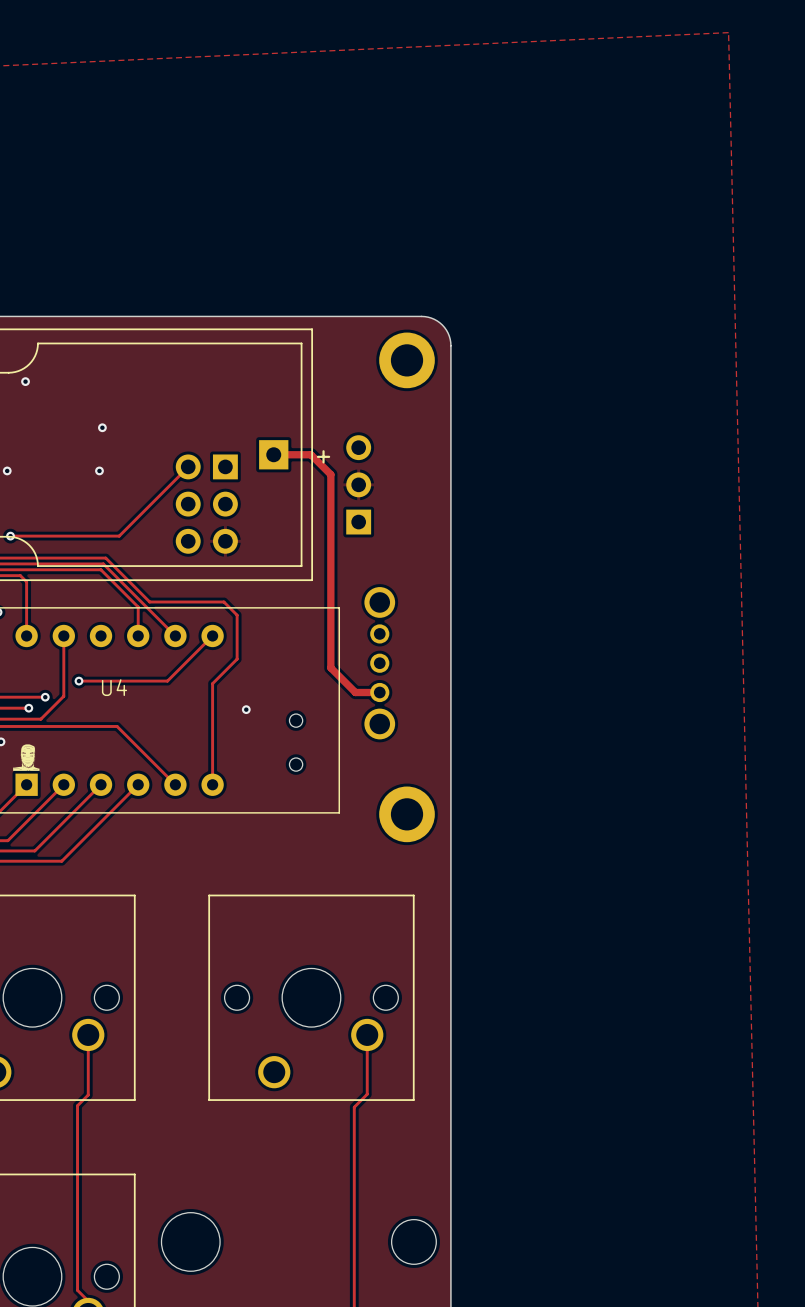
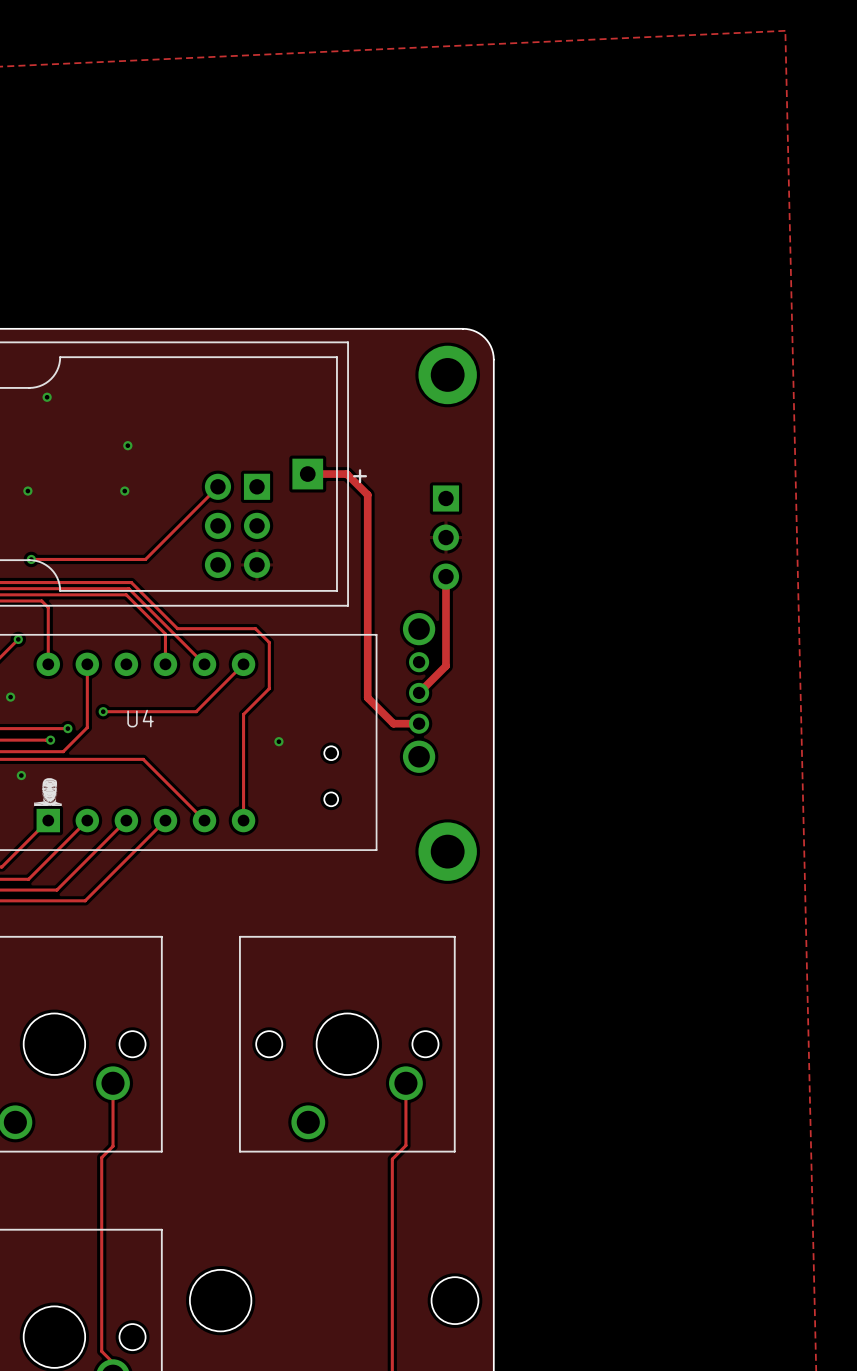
part rotation: 0° (358, 484) -> 180° (445, 537)
track: none -> (445, 576) (445, 666) (419, 692)

